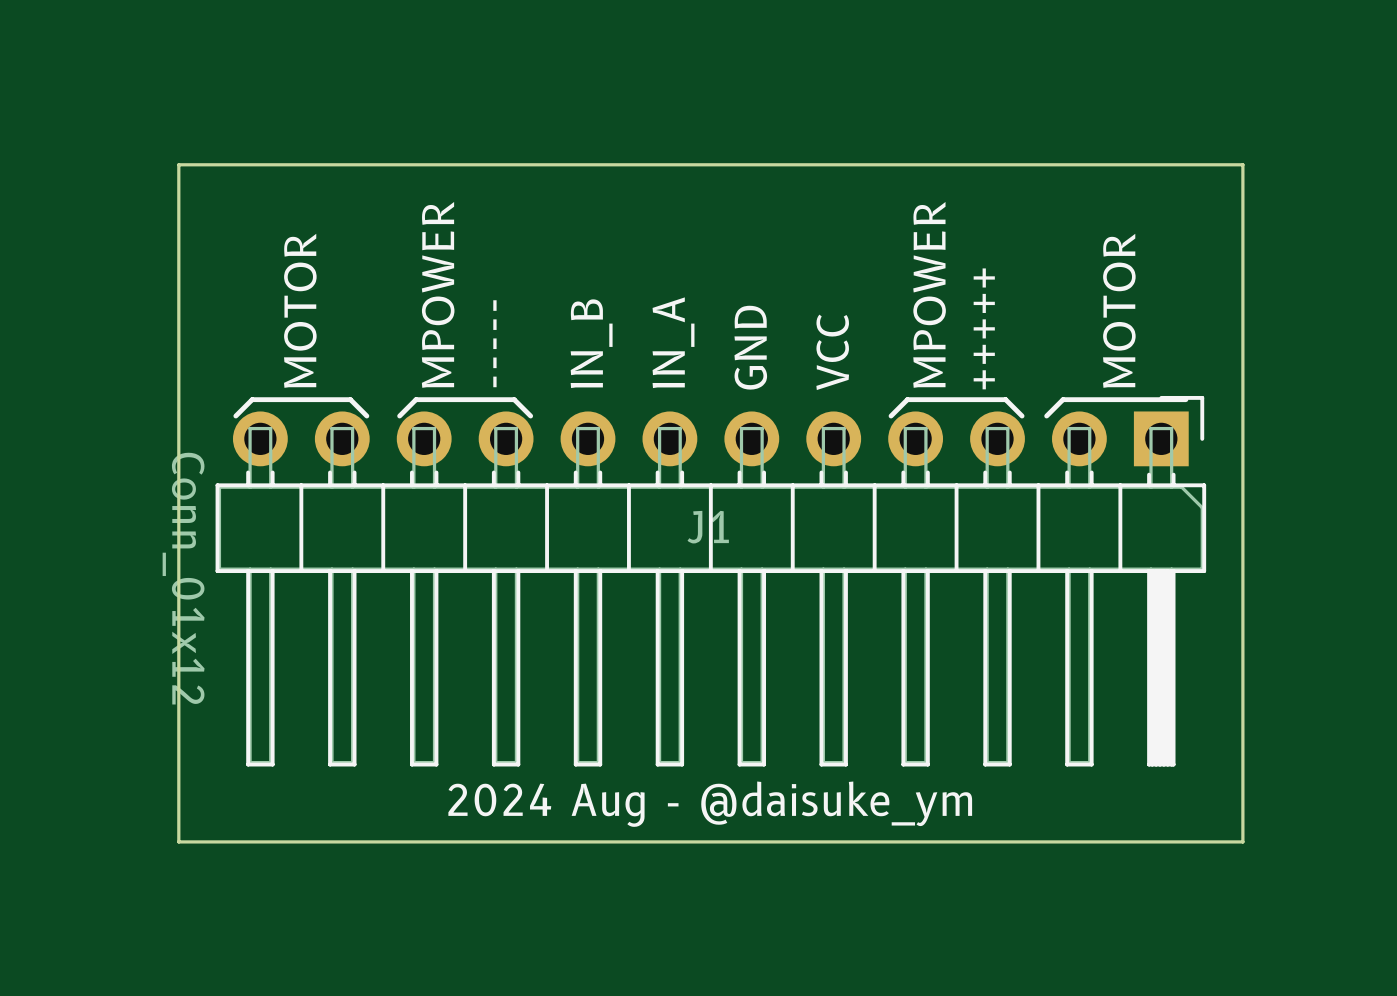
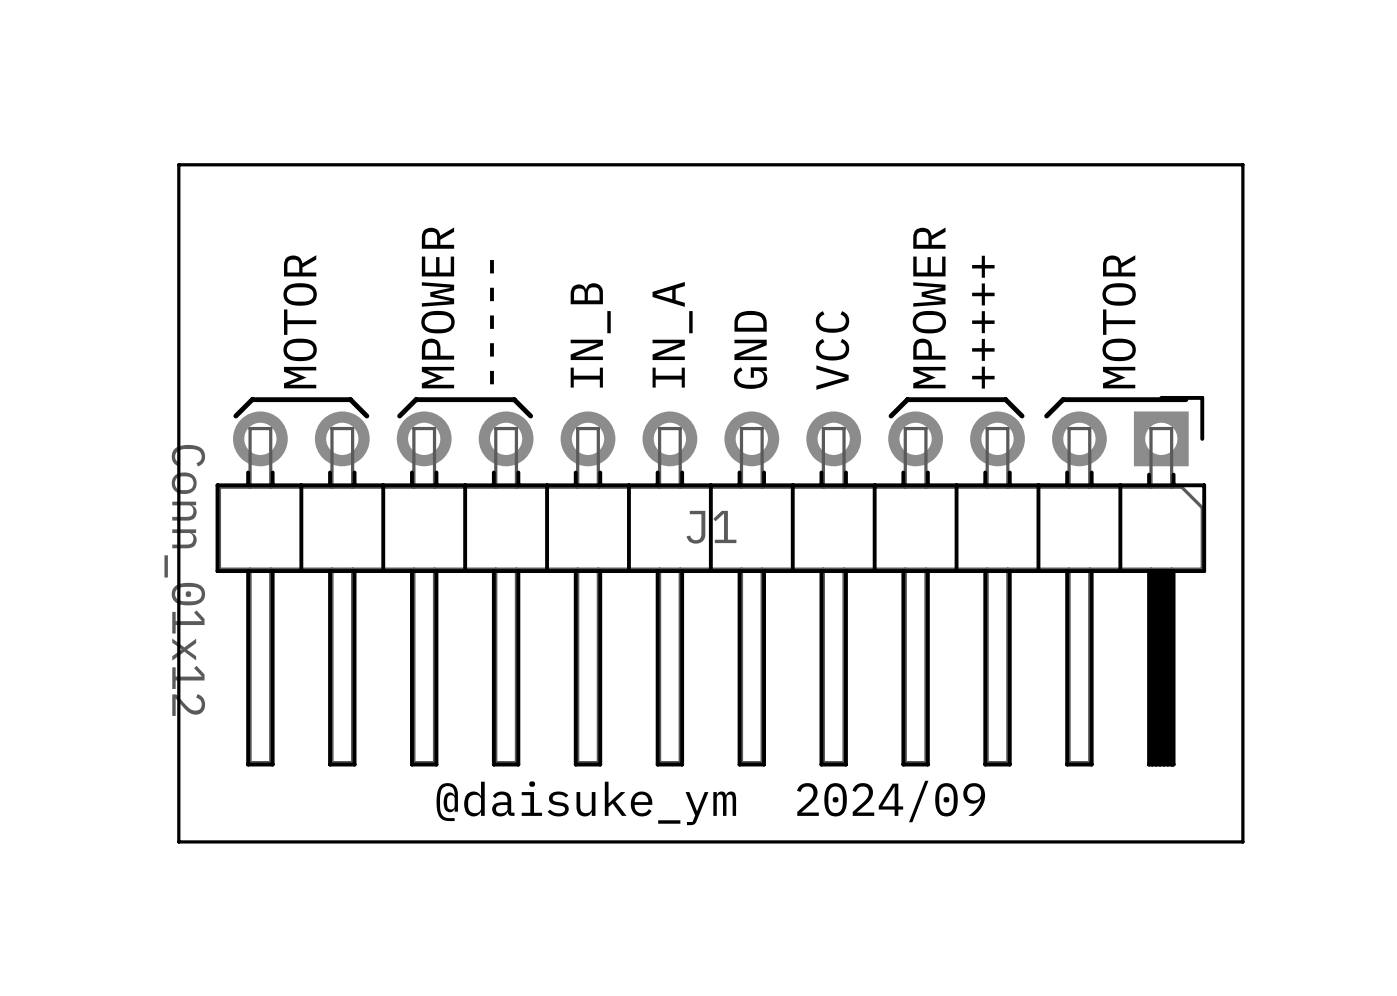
text: 2024 Aug - @daisuke_ym (710, 804) -> @daisuke_ym 2024/09 (710, 802)

